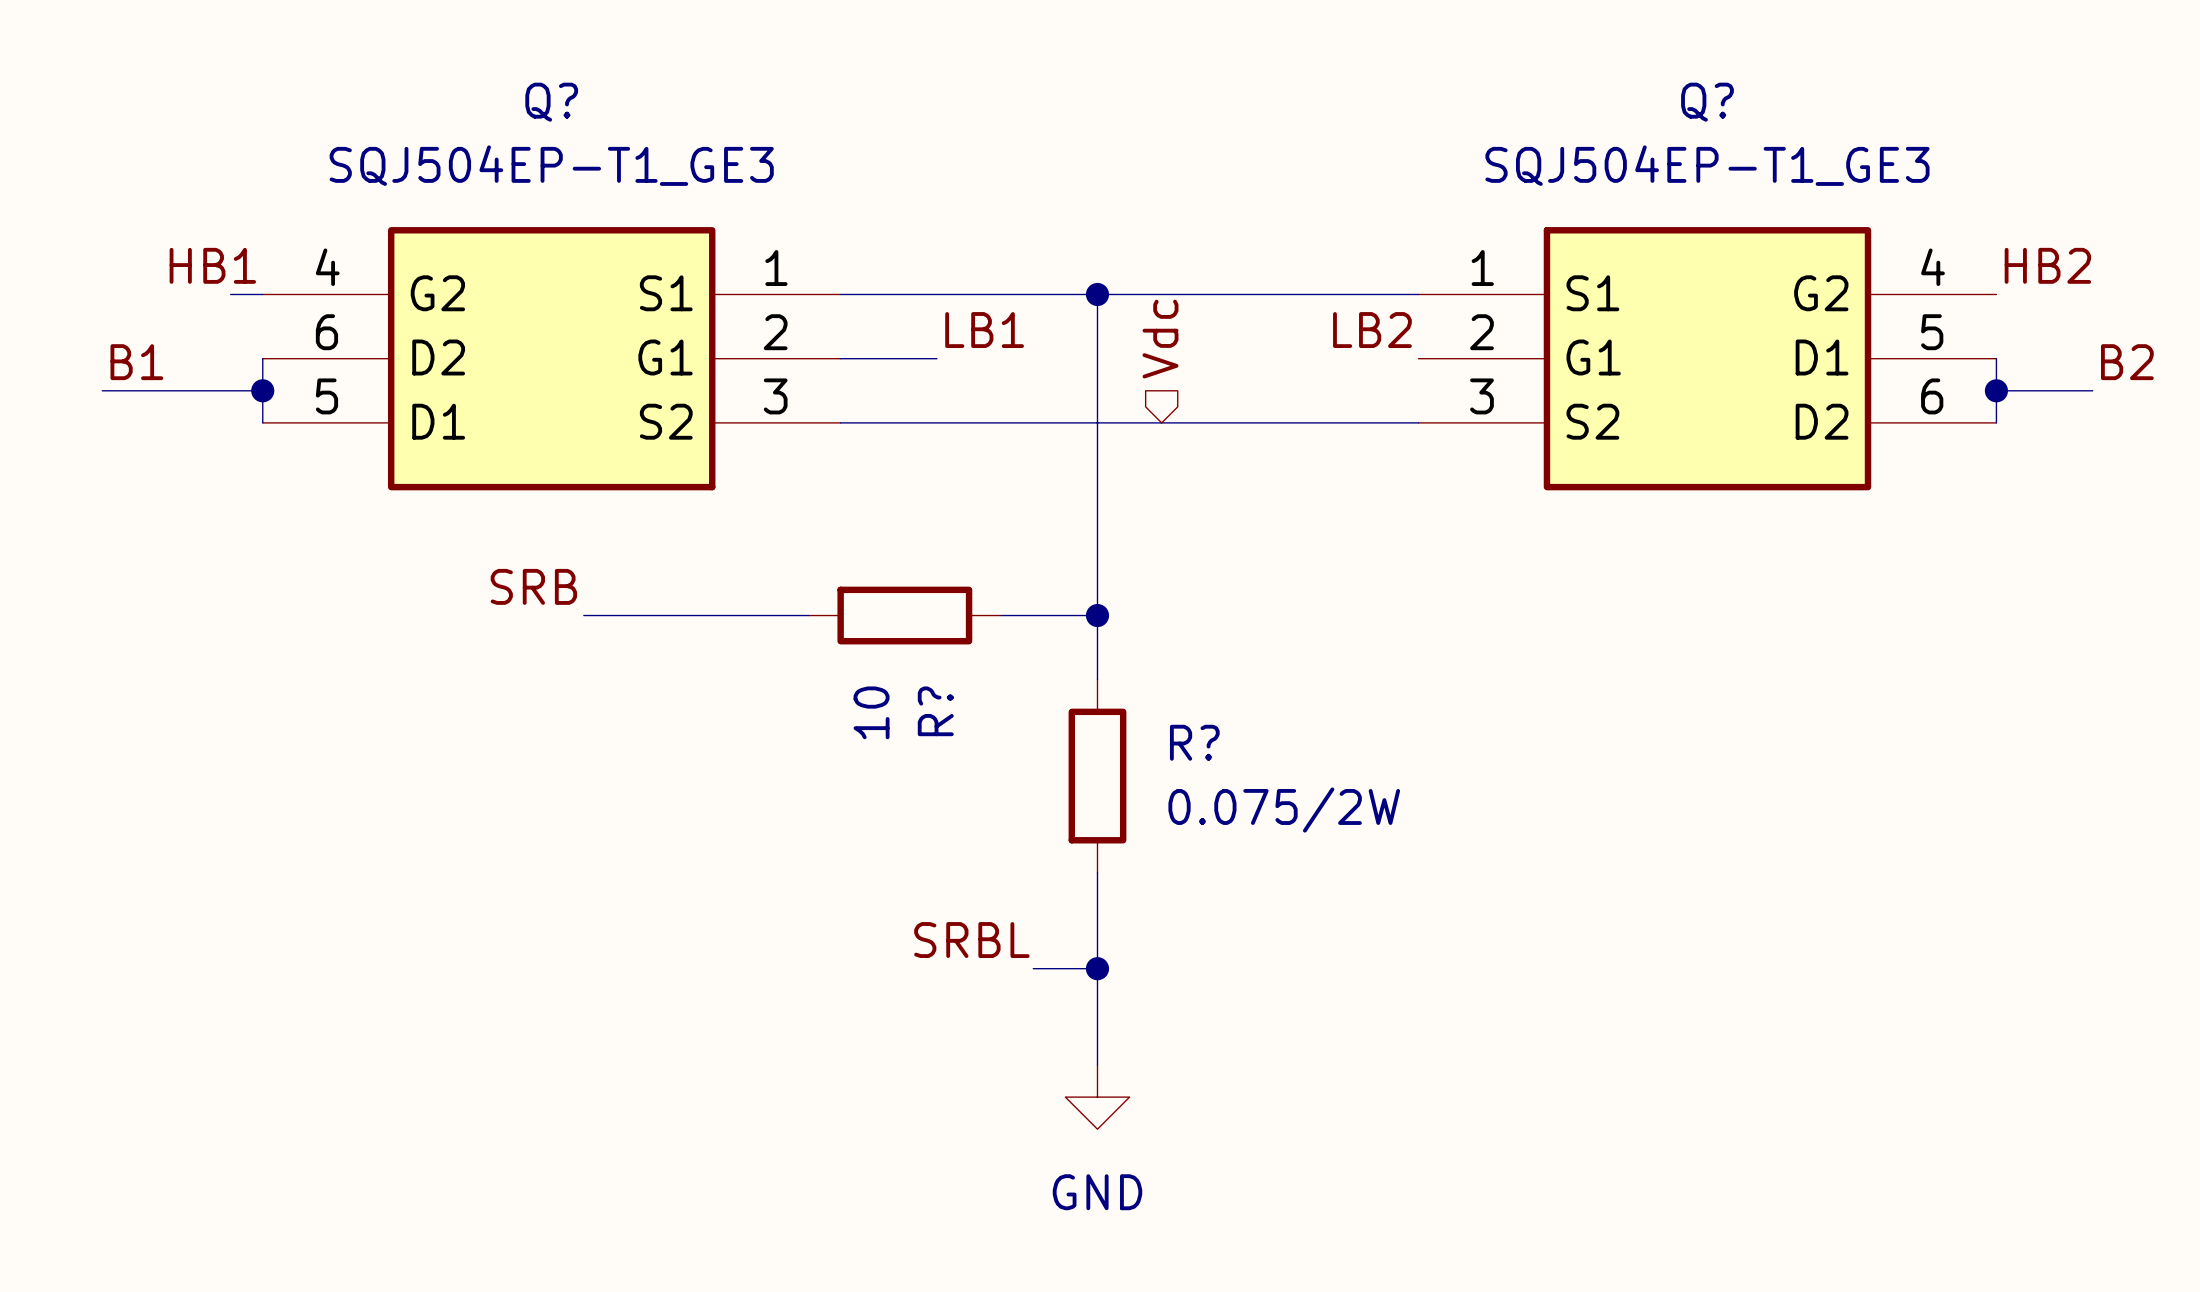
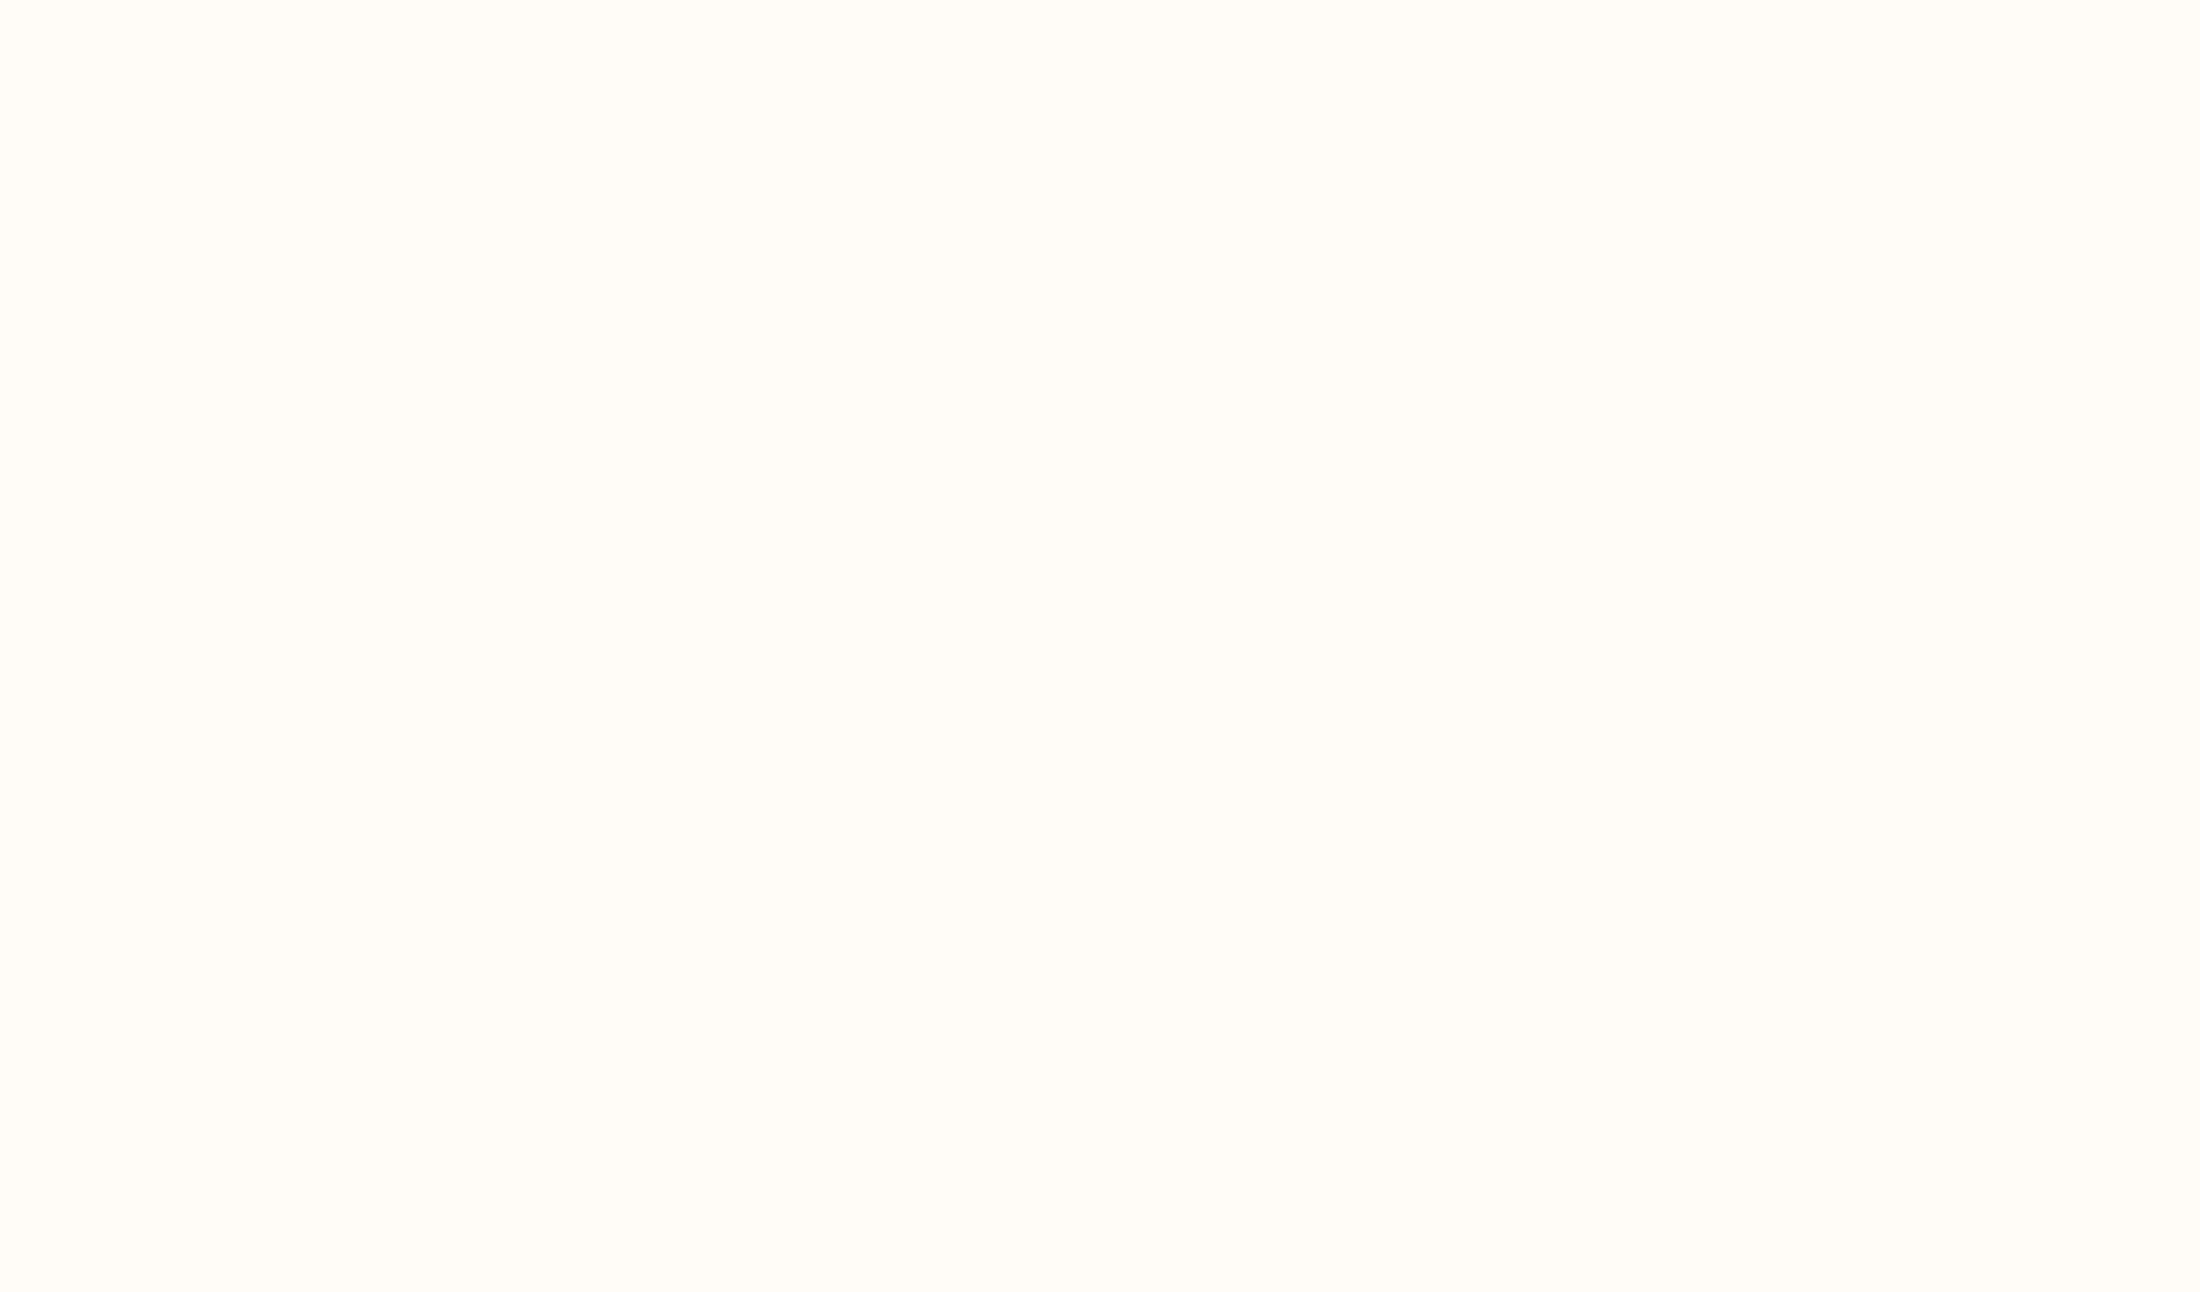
label: HB1 (212, 265) -> none
label: HB2 (2047, 265) -> none
wire: (230, 294) (262, 294) -> none
wire: (840, 294) (1418, 294) -> none
wire: (1097, 294) (1097, 679) -> none
junction: (1097, 294) -> none
label: LB1 (984, 330) -> none
label: LB2 (1372, 330) -> none
hierarchical label: Vdc (1160, 339) -> none
wire: (262, 358) (262, 422) -> none
Q?: SQJ504EP-T1_GE3 (551, 358) -> none
wire: (840, 358) (936, 358) -> none
Q?: SQJ504EP-T1_GE3 (1707, 358) -> none
wire: (1996, 358) (1996, 422) -> none
label: B1 (136, 362) -> none
label: B2 (2127, 362) -> none
wire: (102, 390) (262, 390) -> none
junction: (262, 390) -> none
wire: (1996, 390) (2092, 390) -> none
junction: (1996, 390) -> none
wire: (840, 422) (1418, 422) -> none
label: SRB (533, 586) -> none
wire: (583, 615) (808, 615) -> none
R?: 10 (904, 615) -> none
wire: (1001, 615) (1097, 615) -> none
junction: (1097, 615) -> none
R?: 0.075/2W (1097, 776) -> none
wire: (1097, 872) (1097, 1065) -> none
label: SRBL (971, 940) -> none
wire: (1033, 968) (1097, 968) -> none
junction: (1097, 968) -> none
power symbol: GND (1097, 1097) -> none

